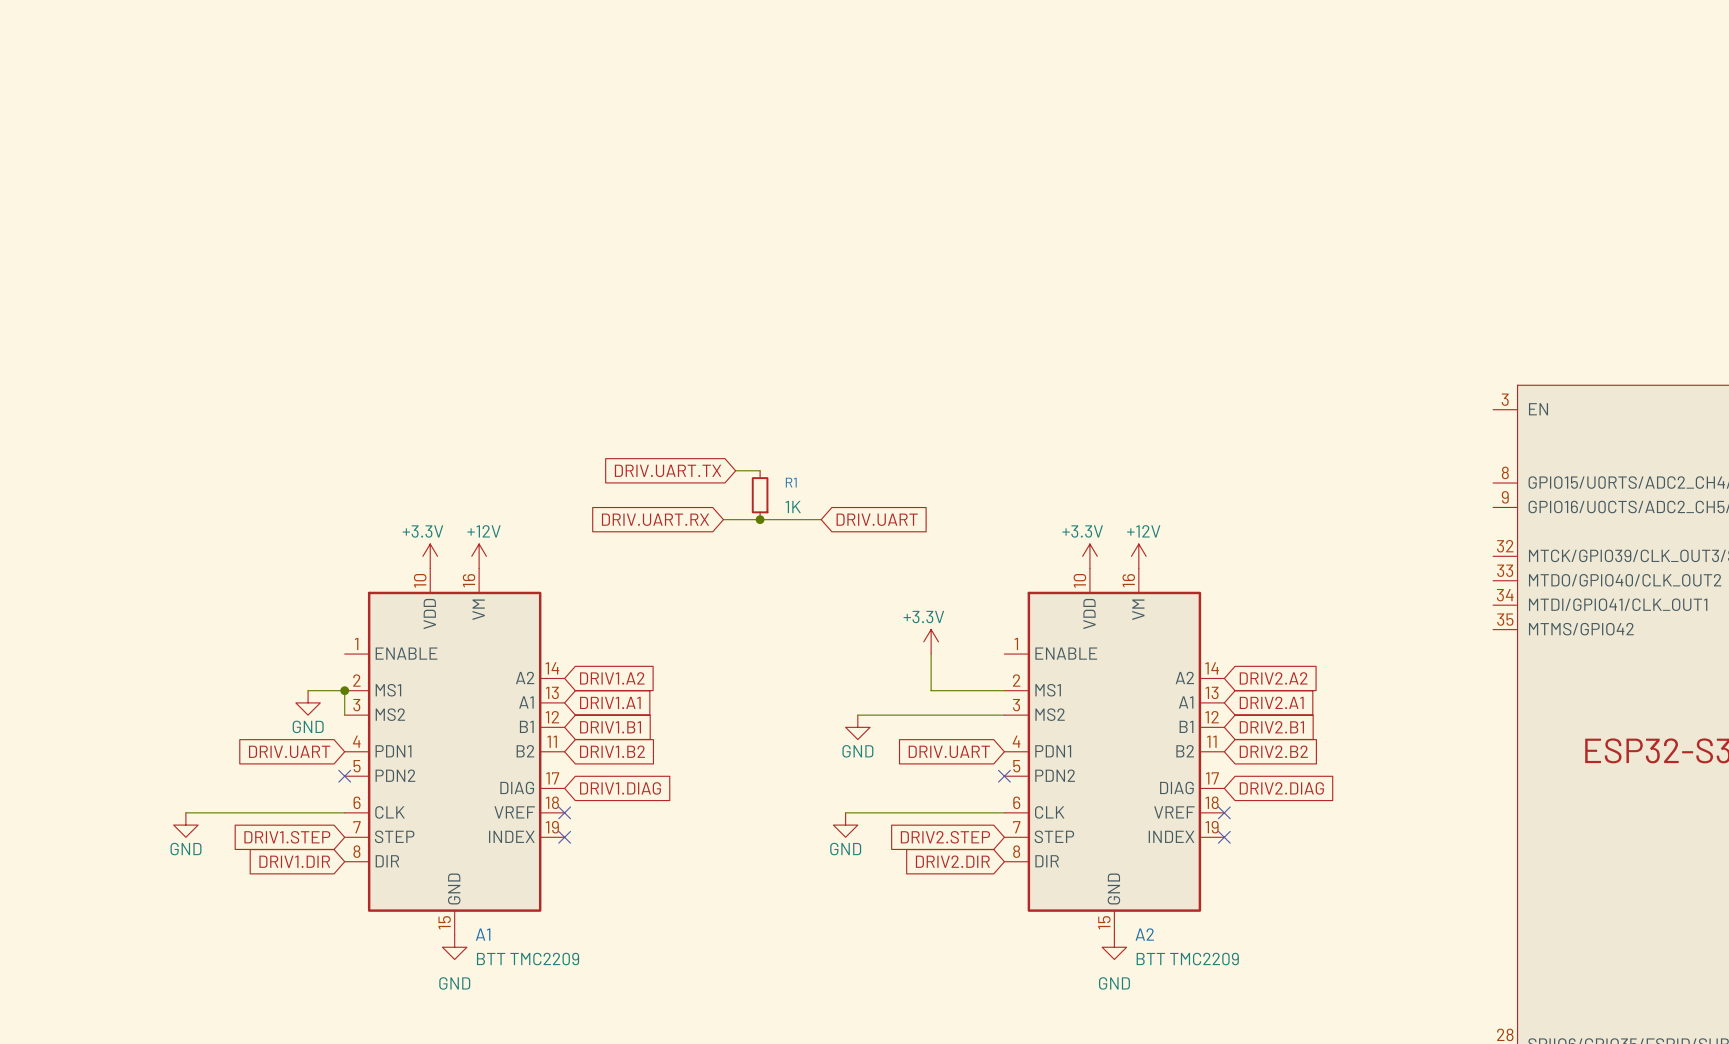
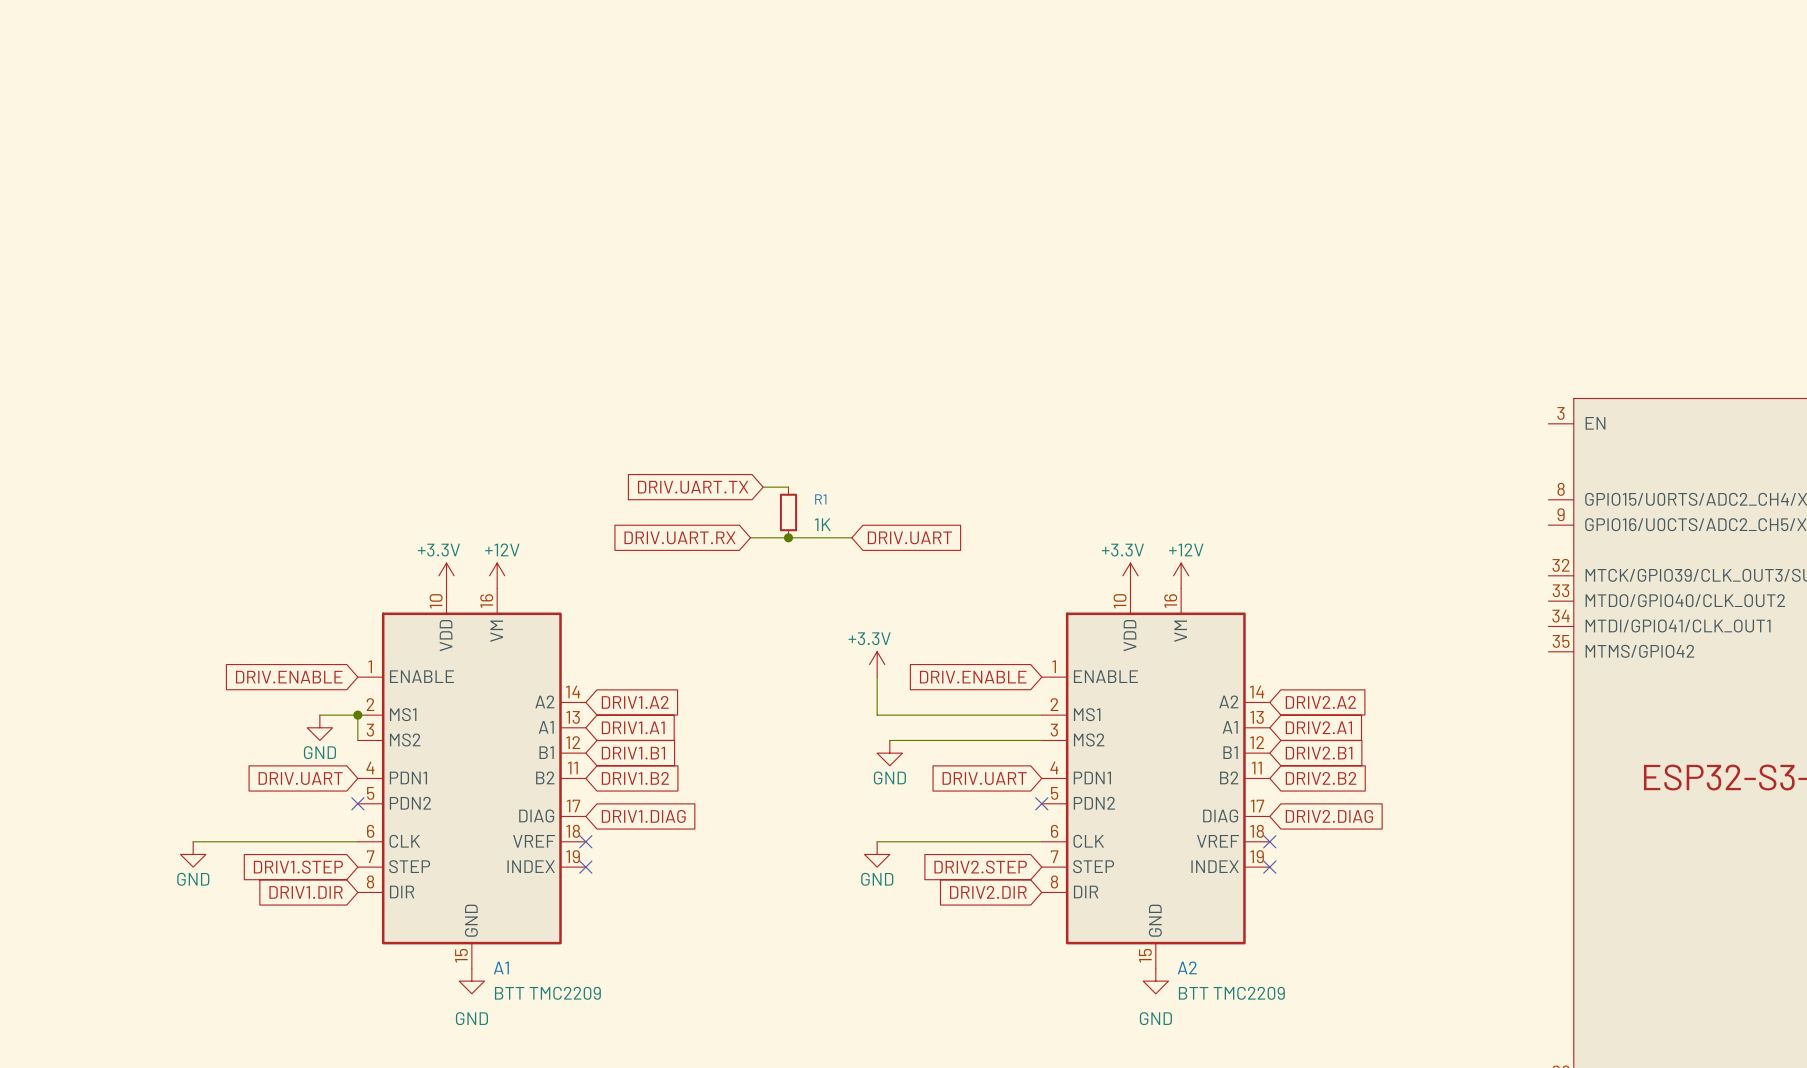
power symbol position: +3.3V (931, 641) -> +3.3V (877, 664)
global label: none -> DRIV.ENABLE (289, 677)
wire: (931, 654) (931, 690) -> (877, 677) (877, 715) (965, 715)
global label: none -> DRIV.ENABLE (973, 677)

